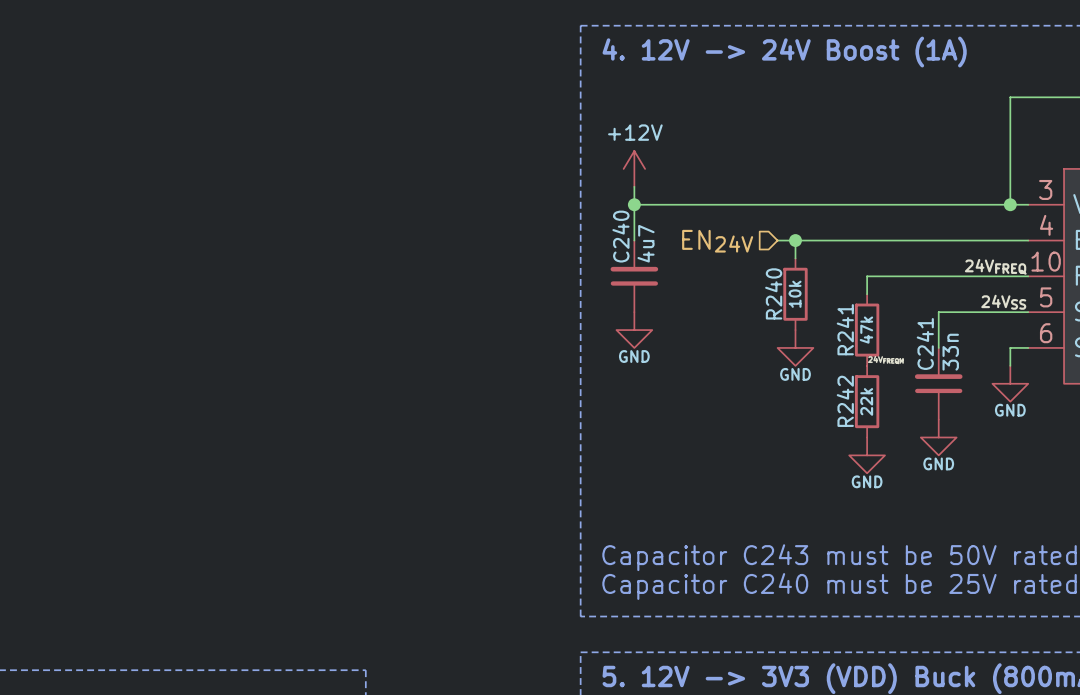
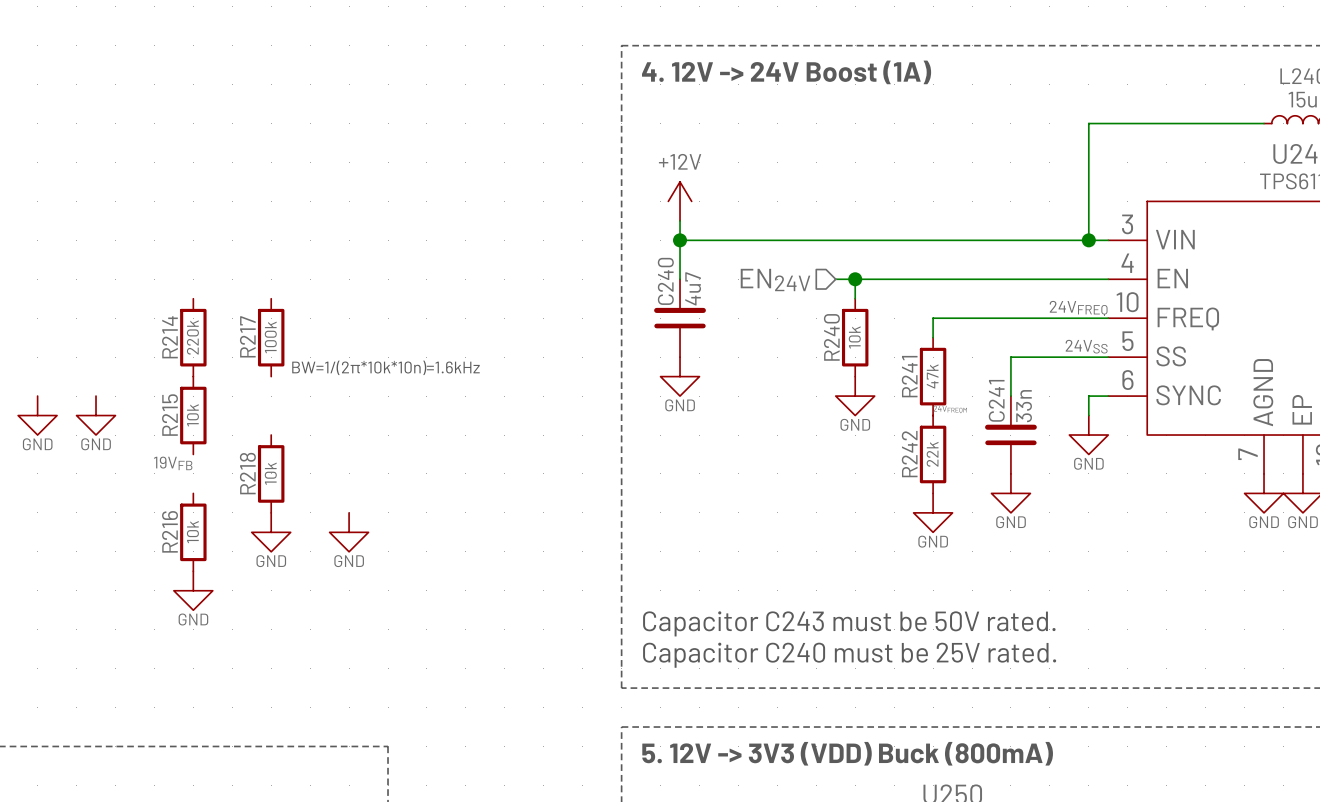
R214: none -> 220k (193, 337)
R217: none -> 100k (271, 337)
text: none -> BW=1/(2π*10k*10n)=1.6kHz (385, 367)
power symbol: none -> GND (37, 415)
power symbol: none -> GND (96, 415)
R215: none -> 10k (193, 415)
label: none -> 19VFB (173, 463)
R218: none -> 10k (271, 473)
R216: none -> 10k (193, 532)
power symbol: none -> GND (271, 532)
power symbol: none -> GND (349, 532)
power symbol: none -> GND (193, 590)

